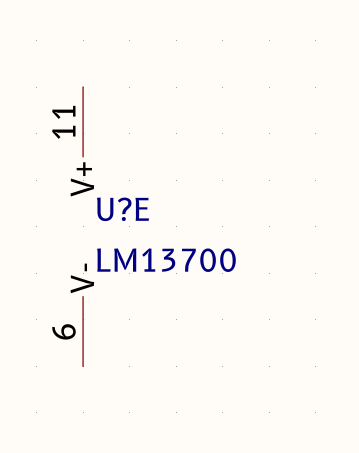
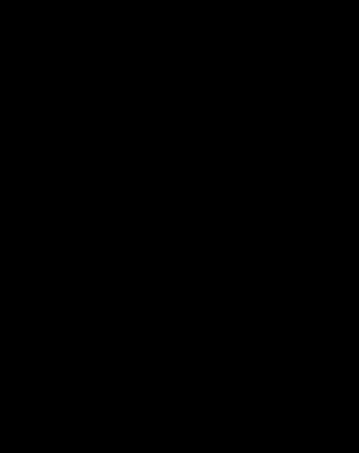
U?E: LM13700 (83, 226) -> none

